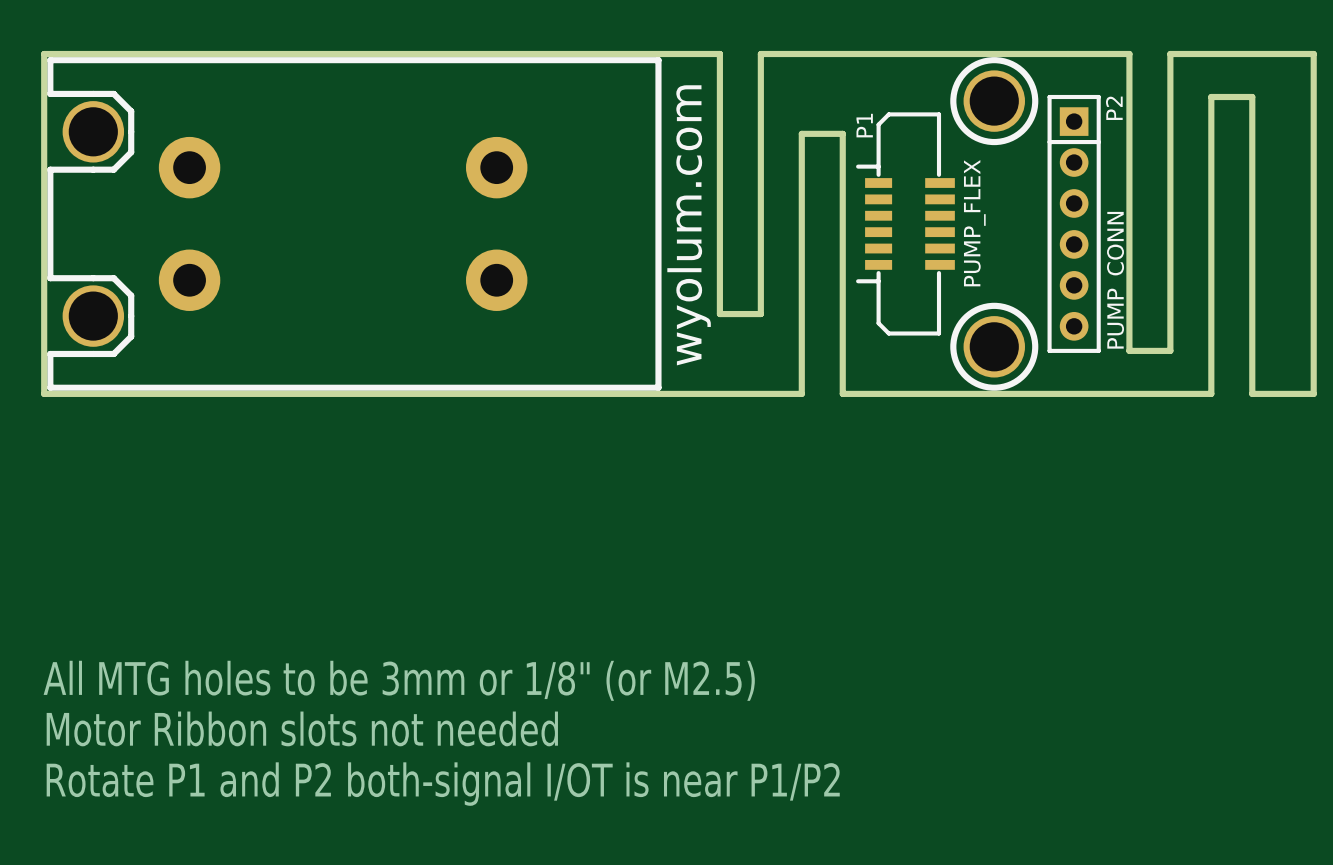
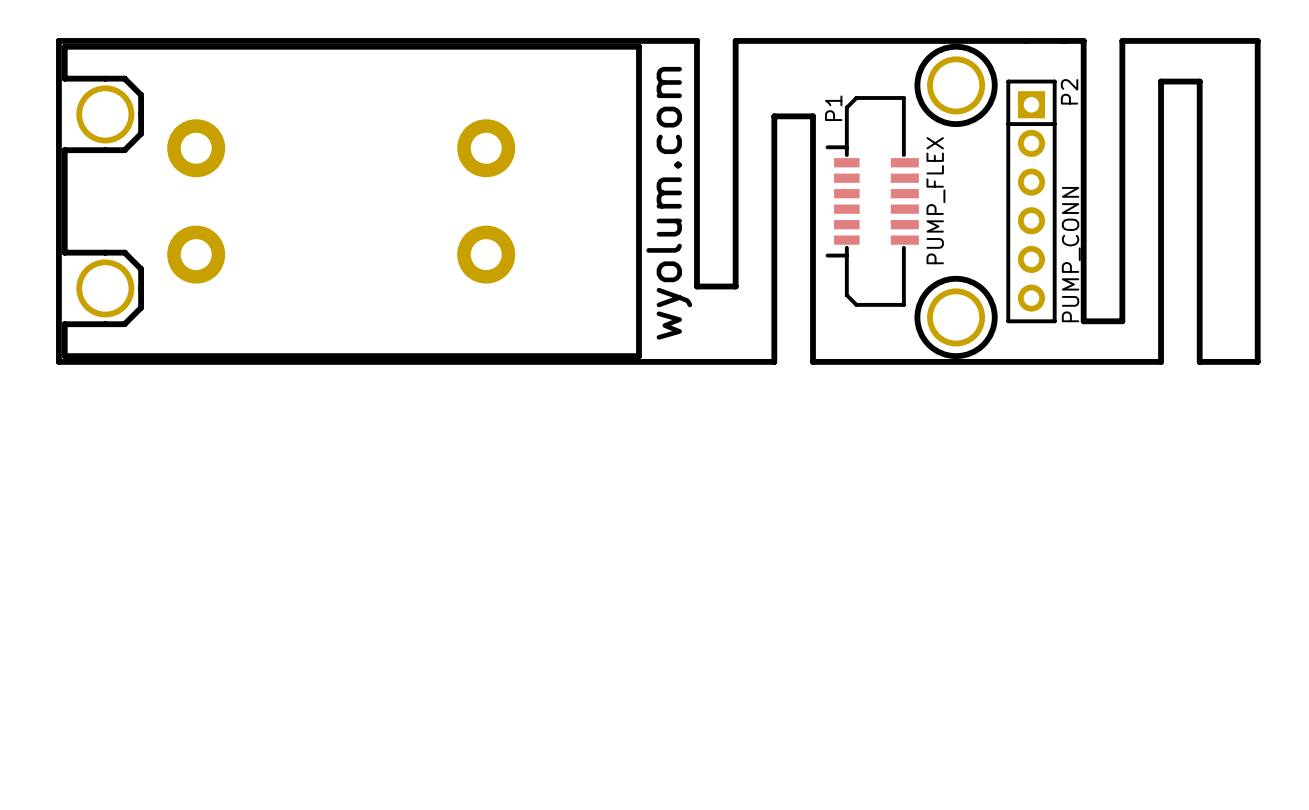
text: All MTG holes to be 3mm or 1/8" (or M2.5) (399, 680) -> none
text: Motor Ribbon slots not needed (302, 728) -> none
text: Rotate P1 and P2 both-signal I/OT is near P1/P2 (443, 784) -> none

